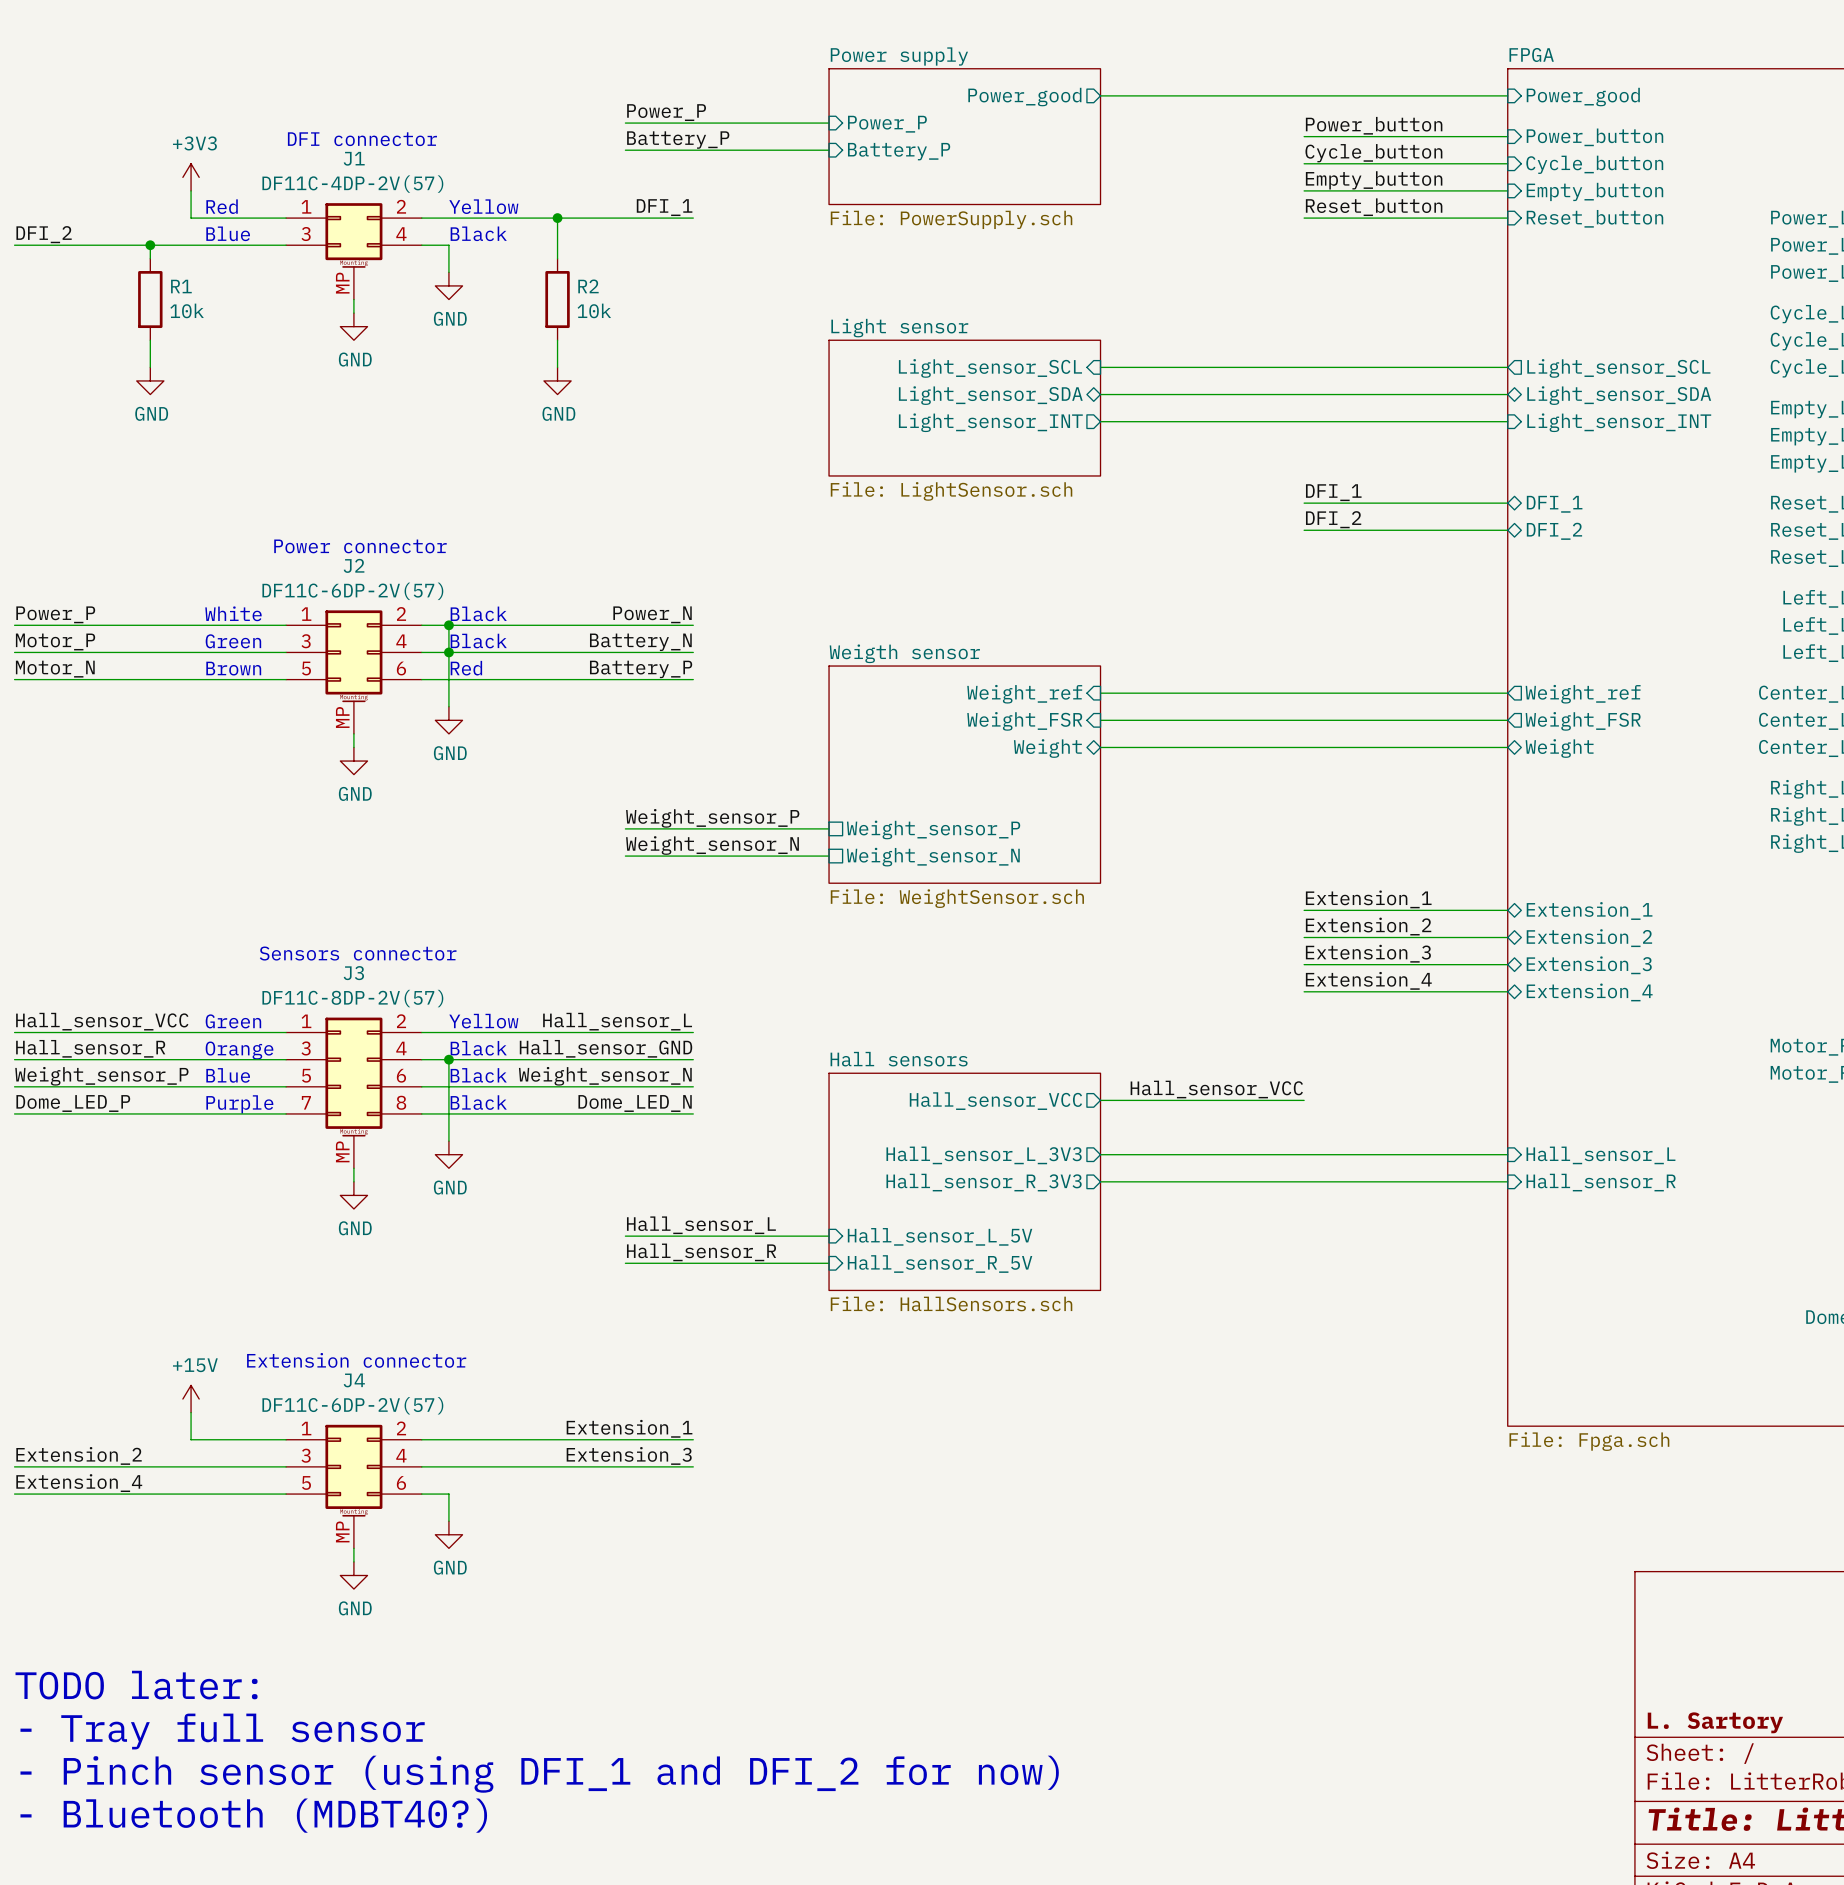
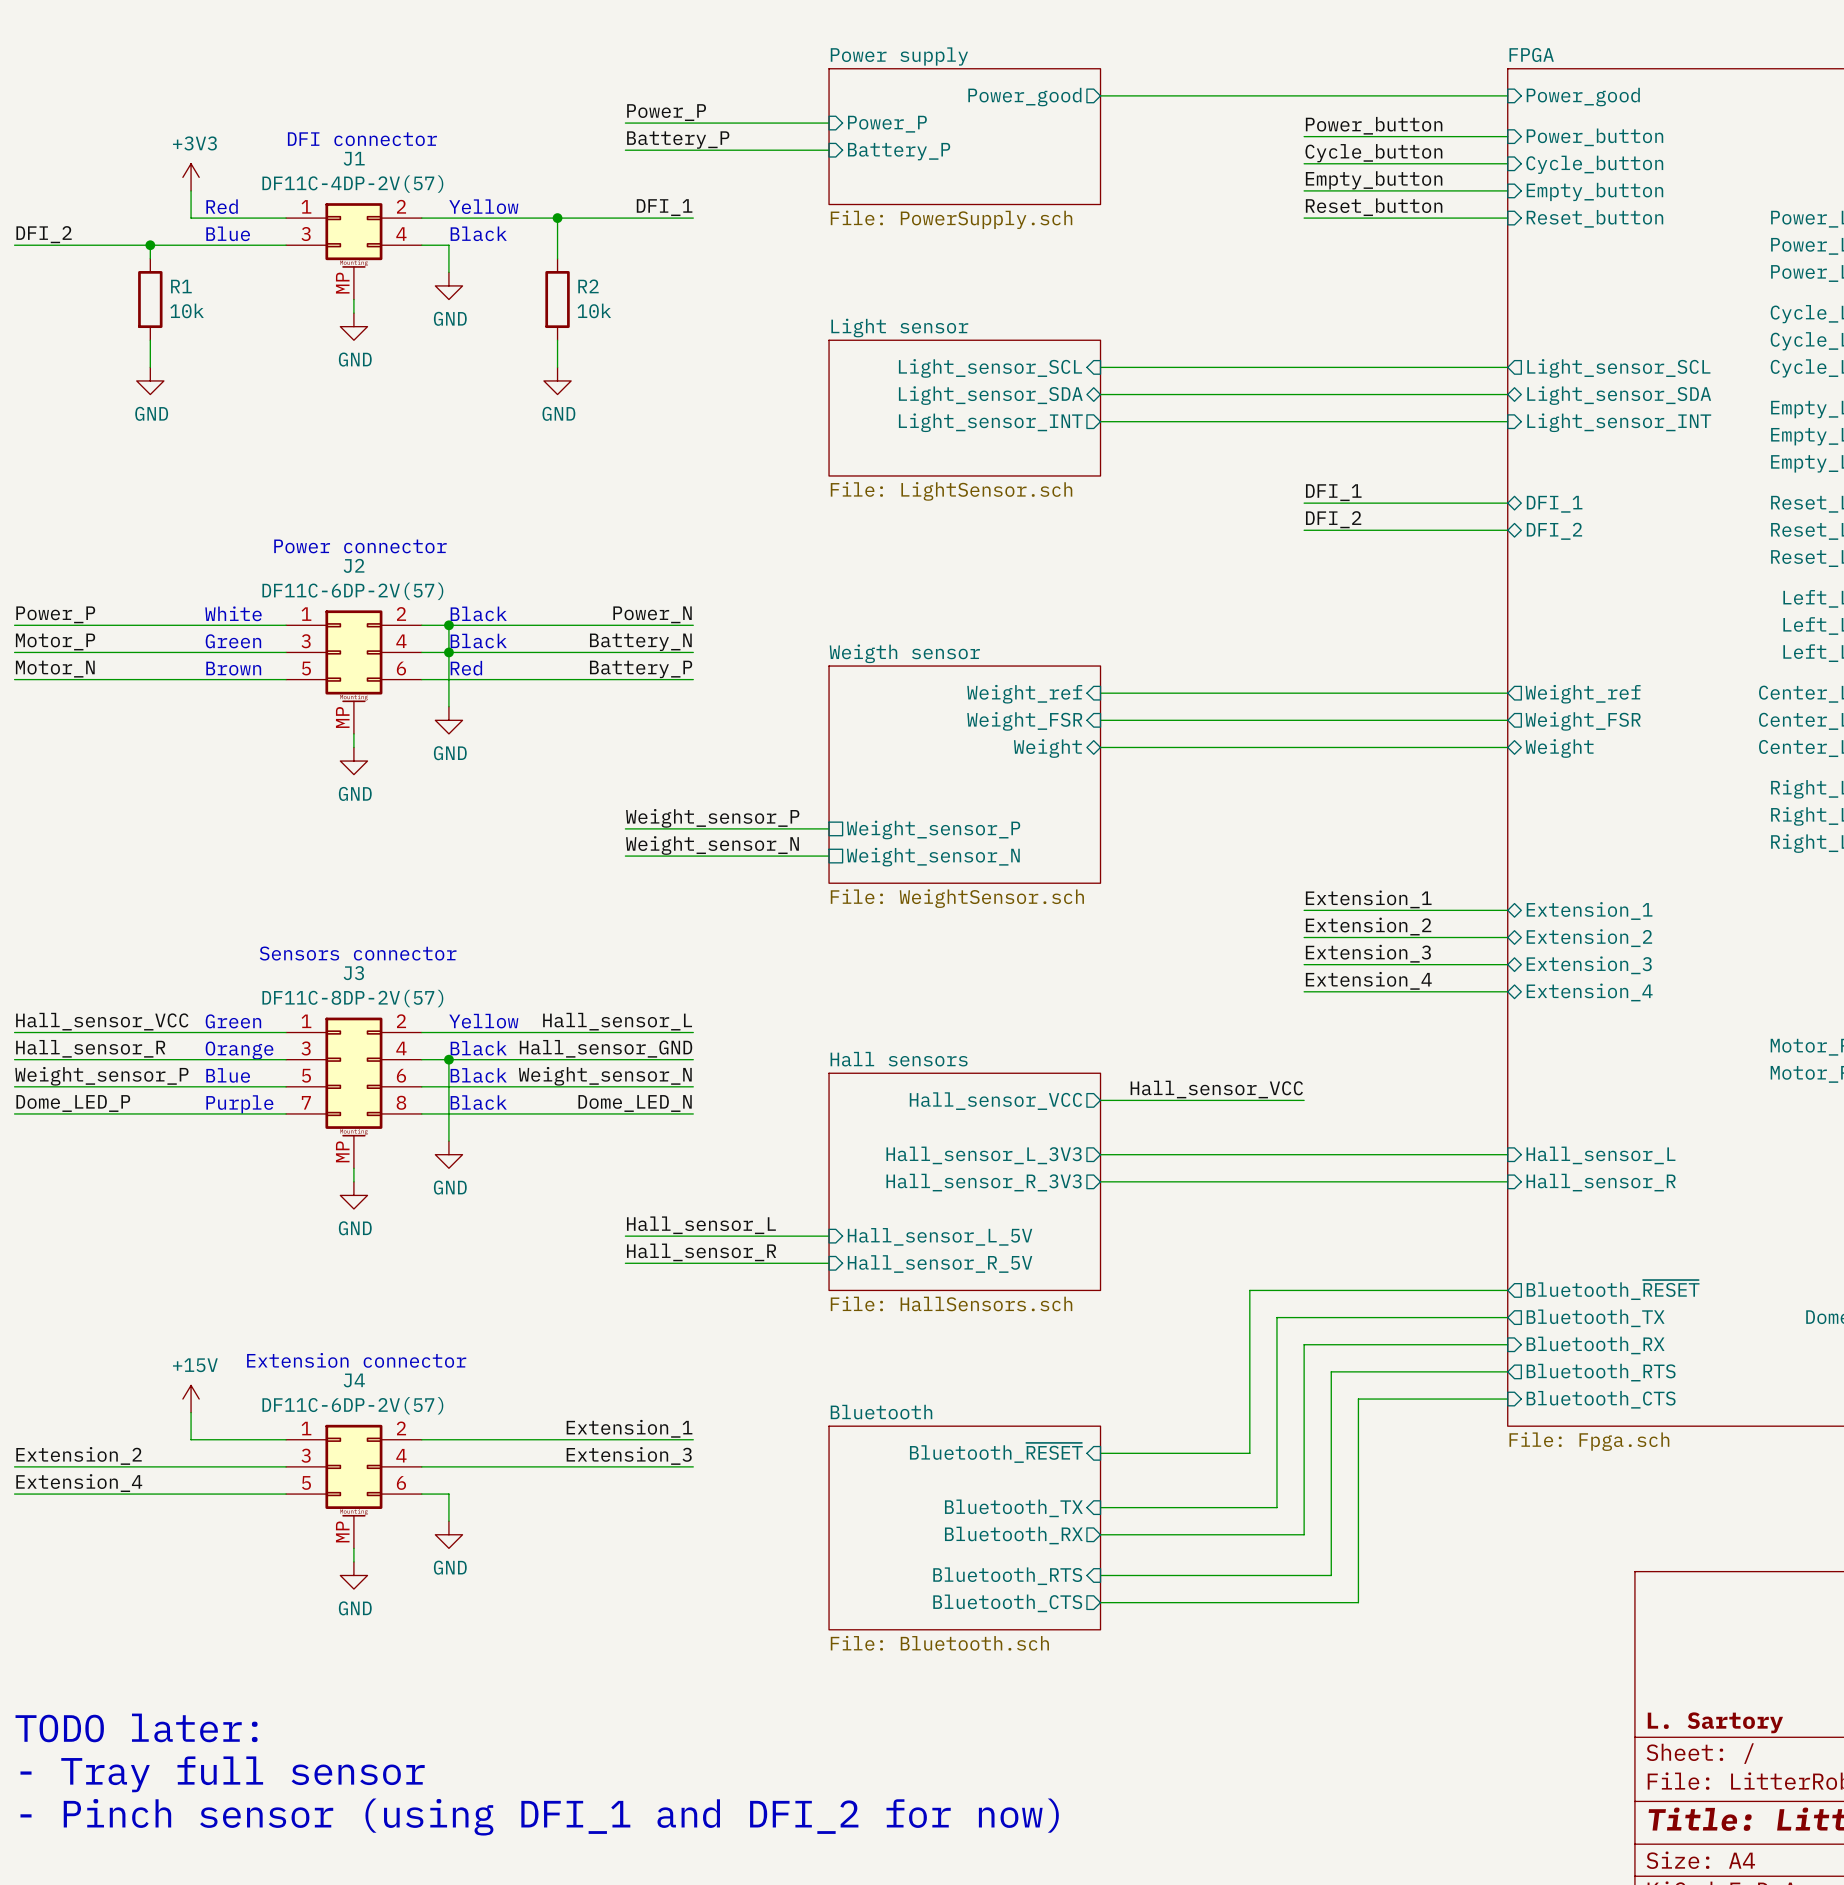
wire: none -> (1507, 1290) (1249, 1290) (1249, 1453) (1100, 1453)
sheet pin: none -> Bluetooth_~{RESET} (1613, 1290)
wire: none -> (1507, 1317) (1276, 1317) (1276, 1507) (1100, 1507)
sheet pin: none -> Bluetooth_TX (1595, 1318)
wire: none -> (1507, 1344) (1304, 1344) (1304, 1534) (1100, 1534)
sheet pin: none -> Bluetooth_RX (1595, 1345)
wire: none -> (1507, 1371) (1331, 1371) (1331, 1575) (1100, 1575)
sheet pin: none -> Bluetooth_RTS (1601, 1372)
wire: none -> (1507, 1399) (1358, 1399) (1358, 1602) (1100, 1602)
sheet pin: none -> Bluetooth_CTS (1601, 1399)
sheet pin: none -> Bluetooth_~{RESET} (996, 1452)
sheet pin: none -> Bluetooth_TX (1013, 1508)
sheet Bluetooth: none -> File: Bluetooth.sch (964, 1527)
sheet pin: none -> Bluetooth_RX (1013, 1535)
sheet pin: none -> Bluetooth_RTS (1007, 1576)
sheet pin: none -> Bluetooth_CTS (1007, 1603)
text: TODO later: (136, 1685) -> none
text: - Tray full sensor (222, 1731) -> TODO later: (136, 1727)
text: - Pinch sensor (using DFI_1 and DFI_2 for now) (539, 1774) -> - Tray full sensor (222, 1774)
text: - Bluetooth (MDBT40?) (253, 1815) -> - Pinch sensor (using DFI_1 and DFI_2 for now) (539, 1817)

